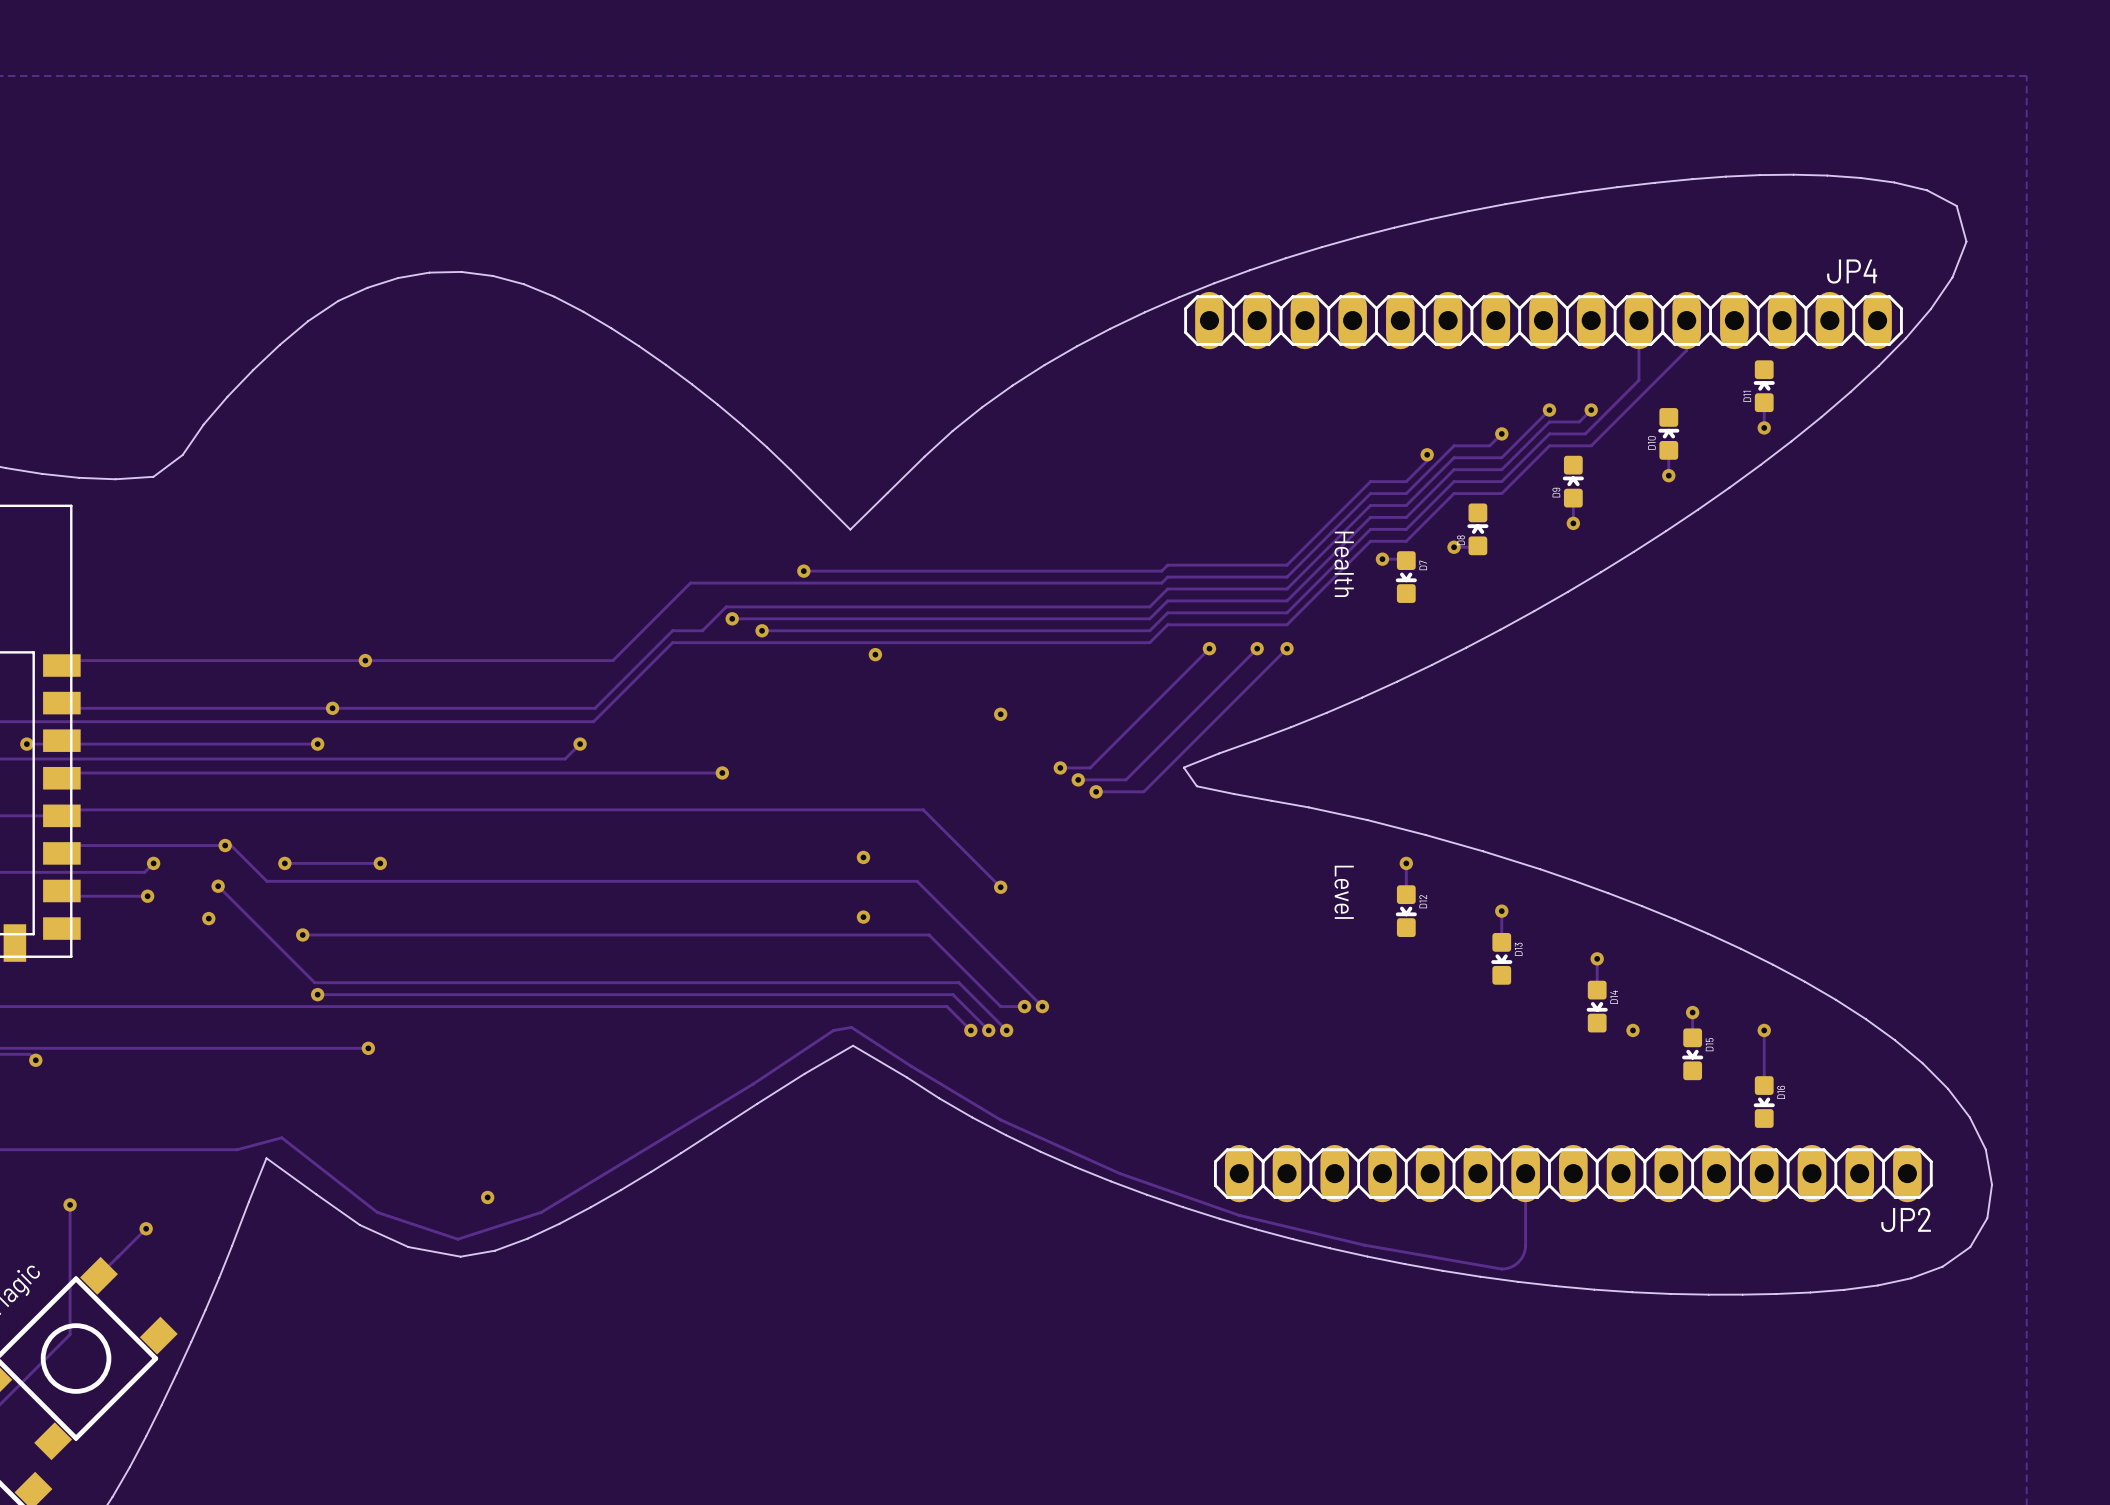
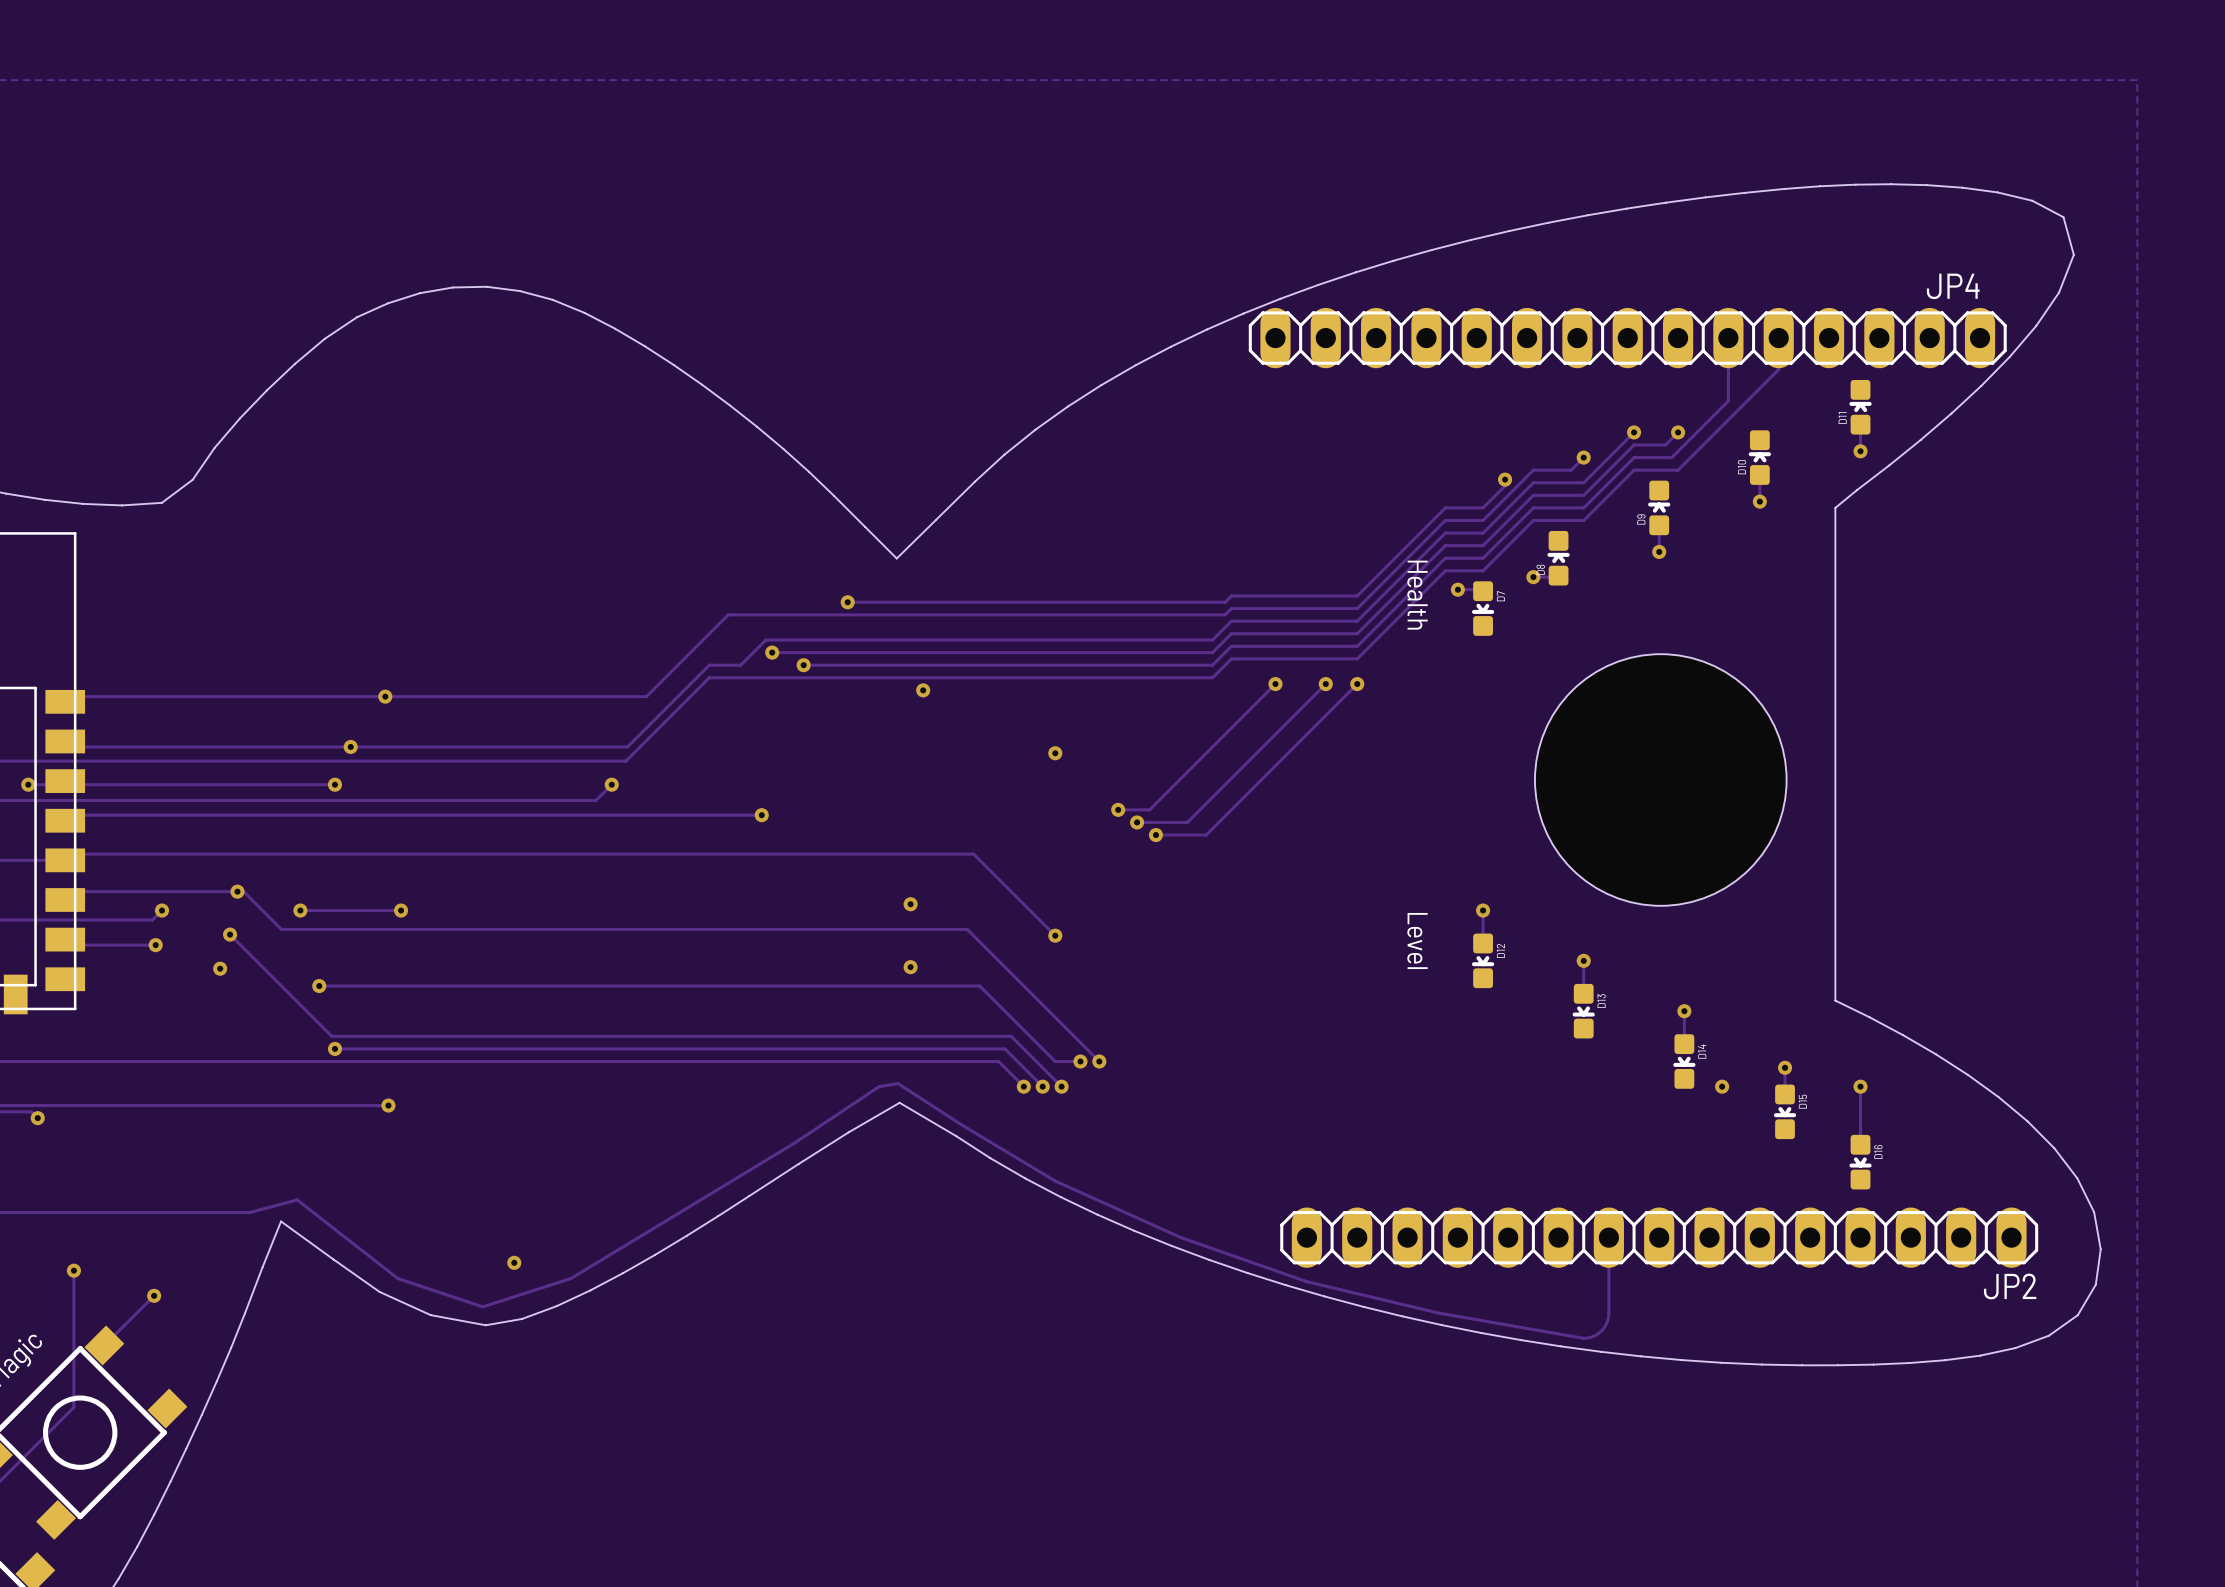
board edge: (1760, 464) (1698, 509) (1633, 552) (1534, 611) (1466, 647) (1397, 681) (1326, 712) (1183, 767) (1196, 786) (1367, 820) (1483, 851) (1540, 869) (1675, 919) (1773, 964) -> (1856, 490) (1835, 507) (1835, 1000) (1869, 1017)
hole: none -> (1660, 780)

